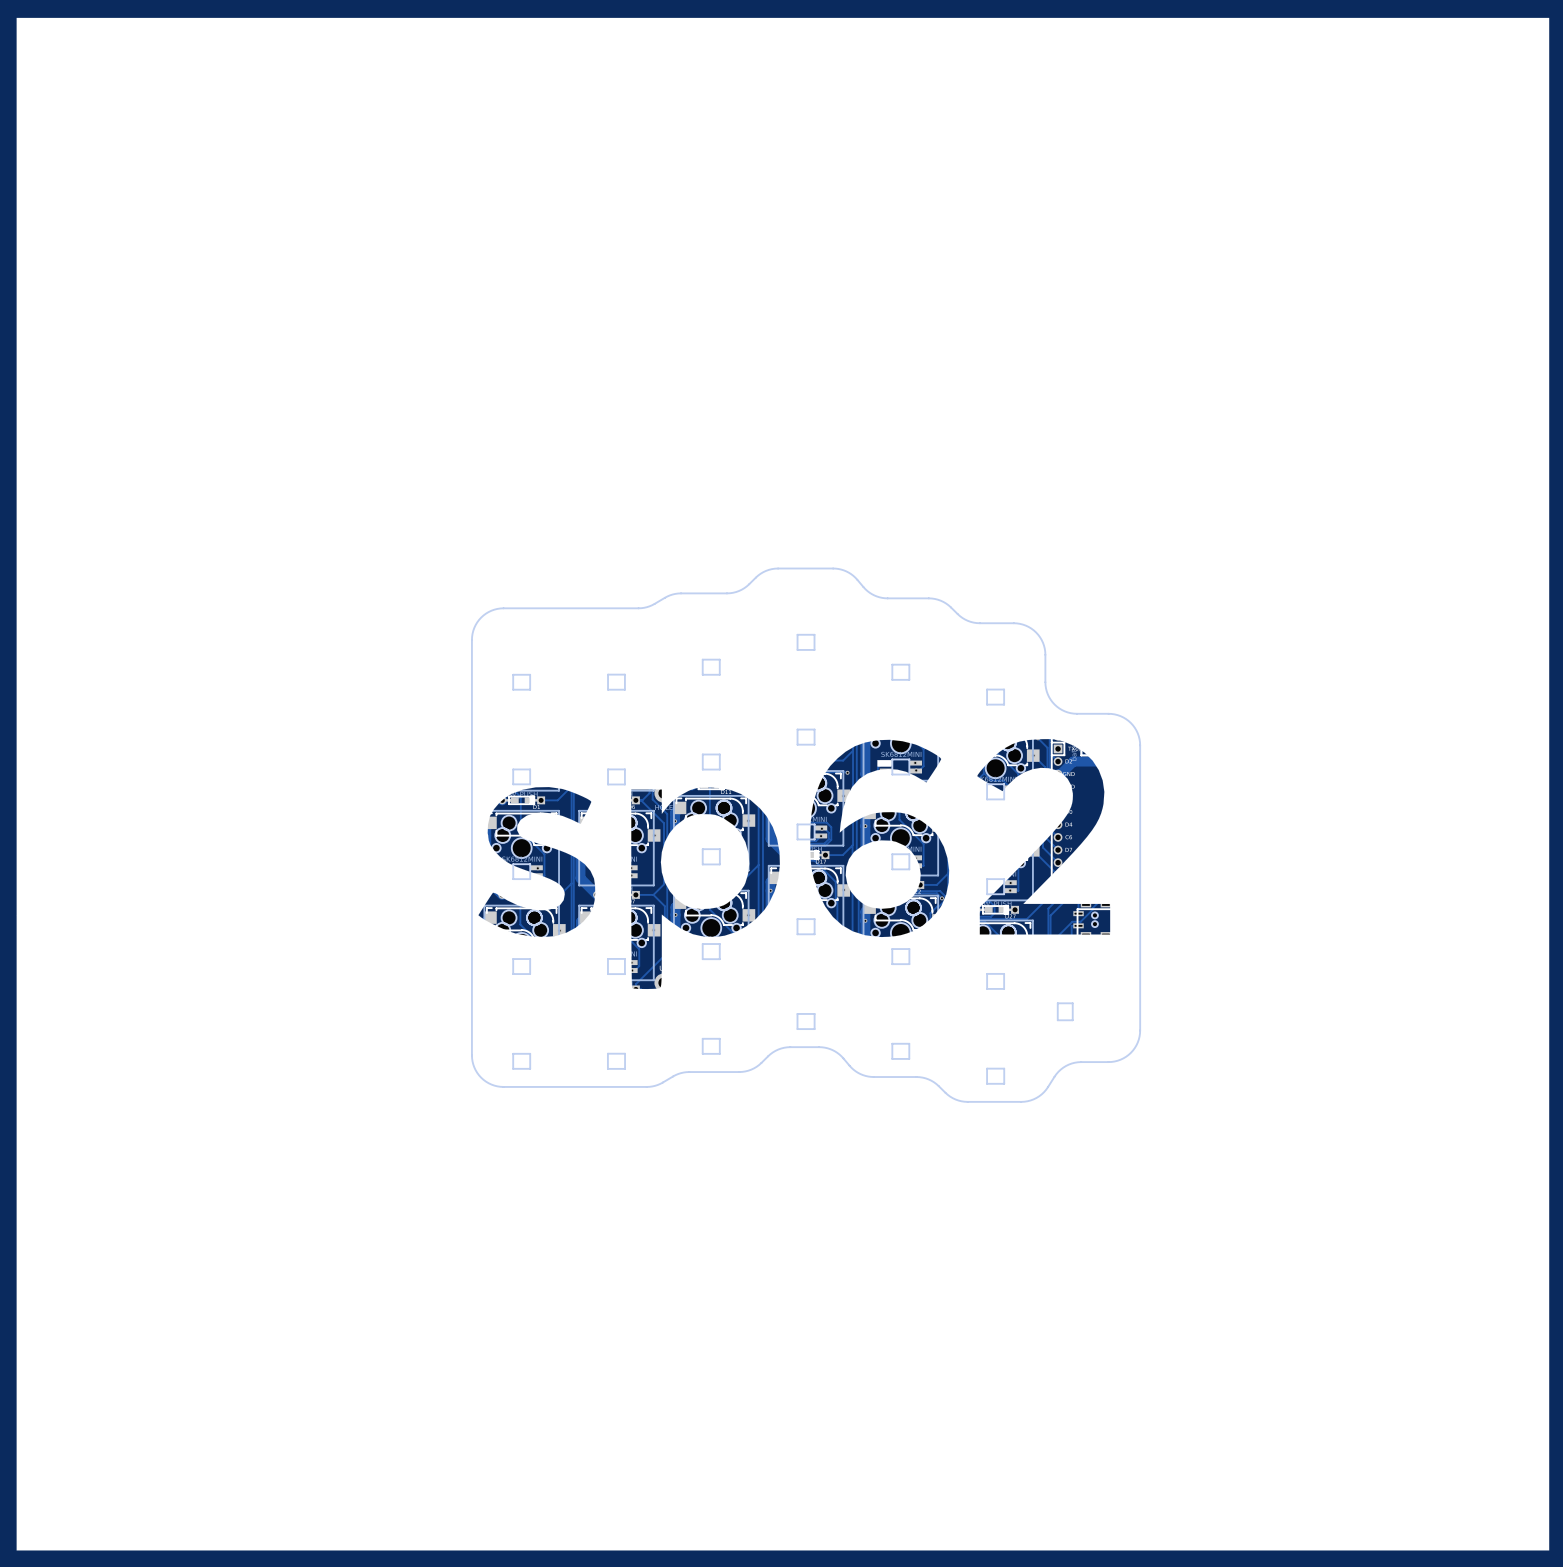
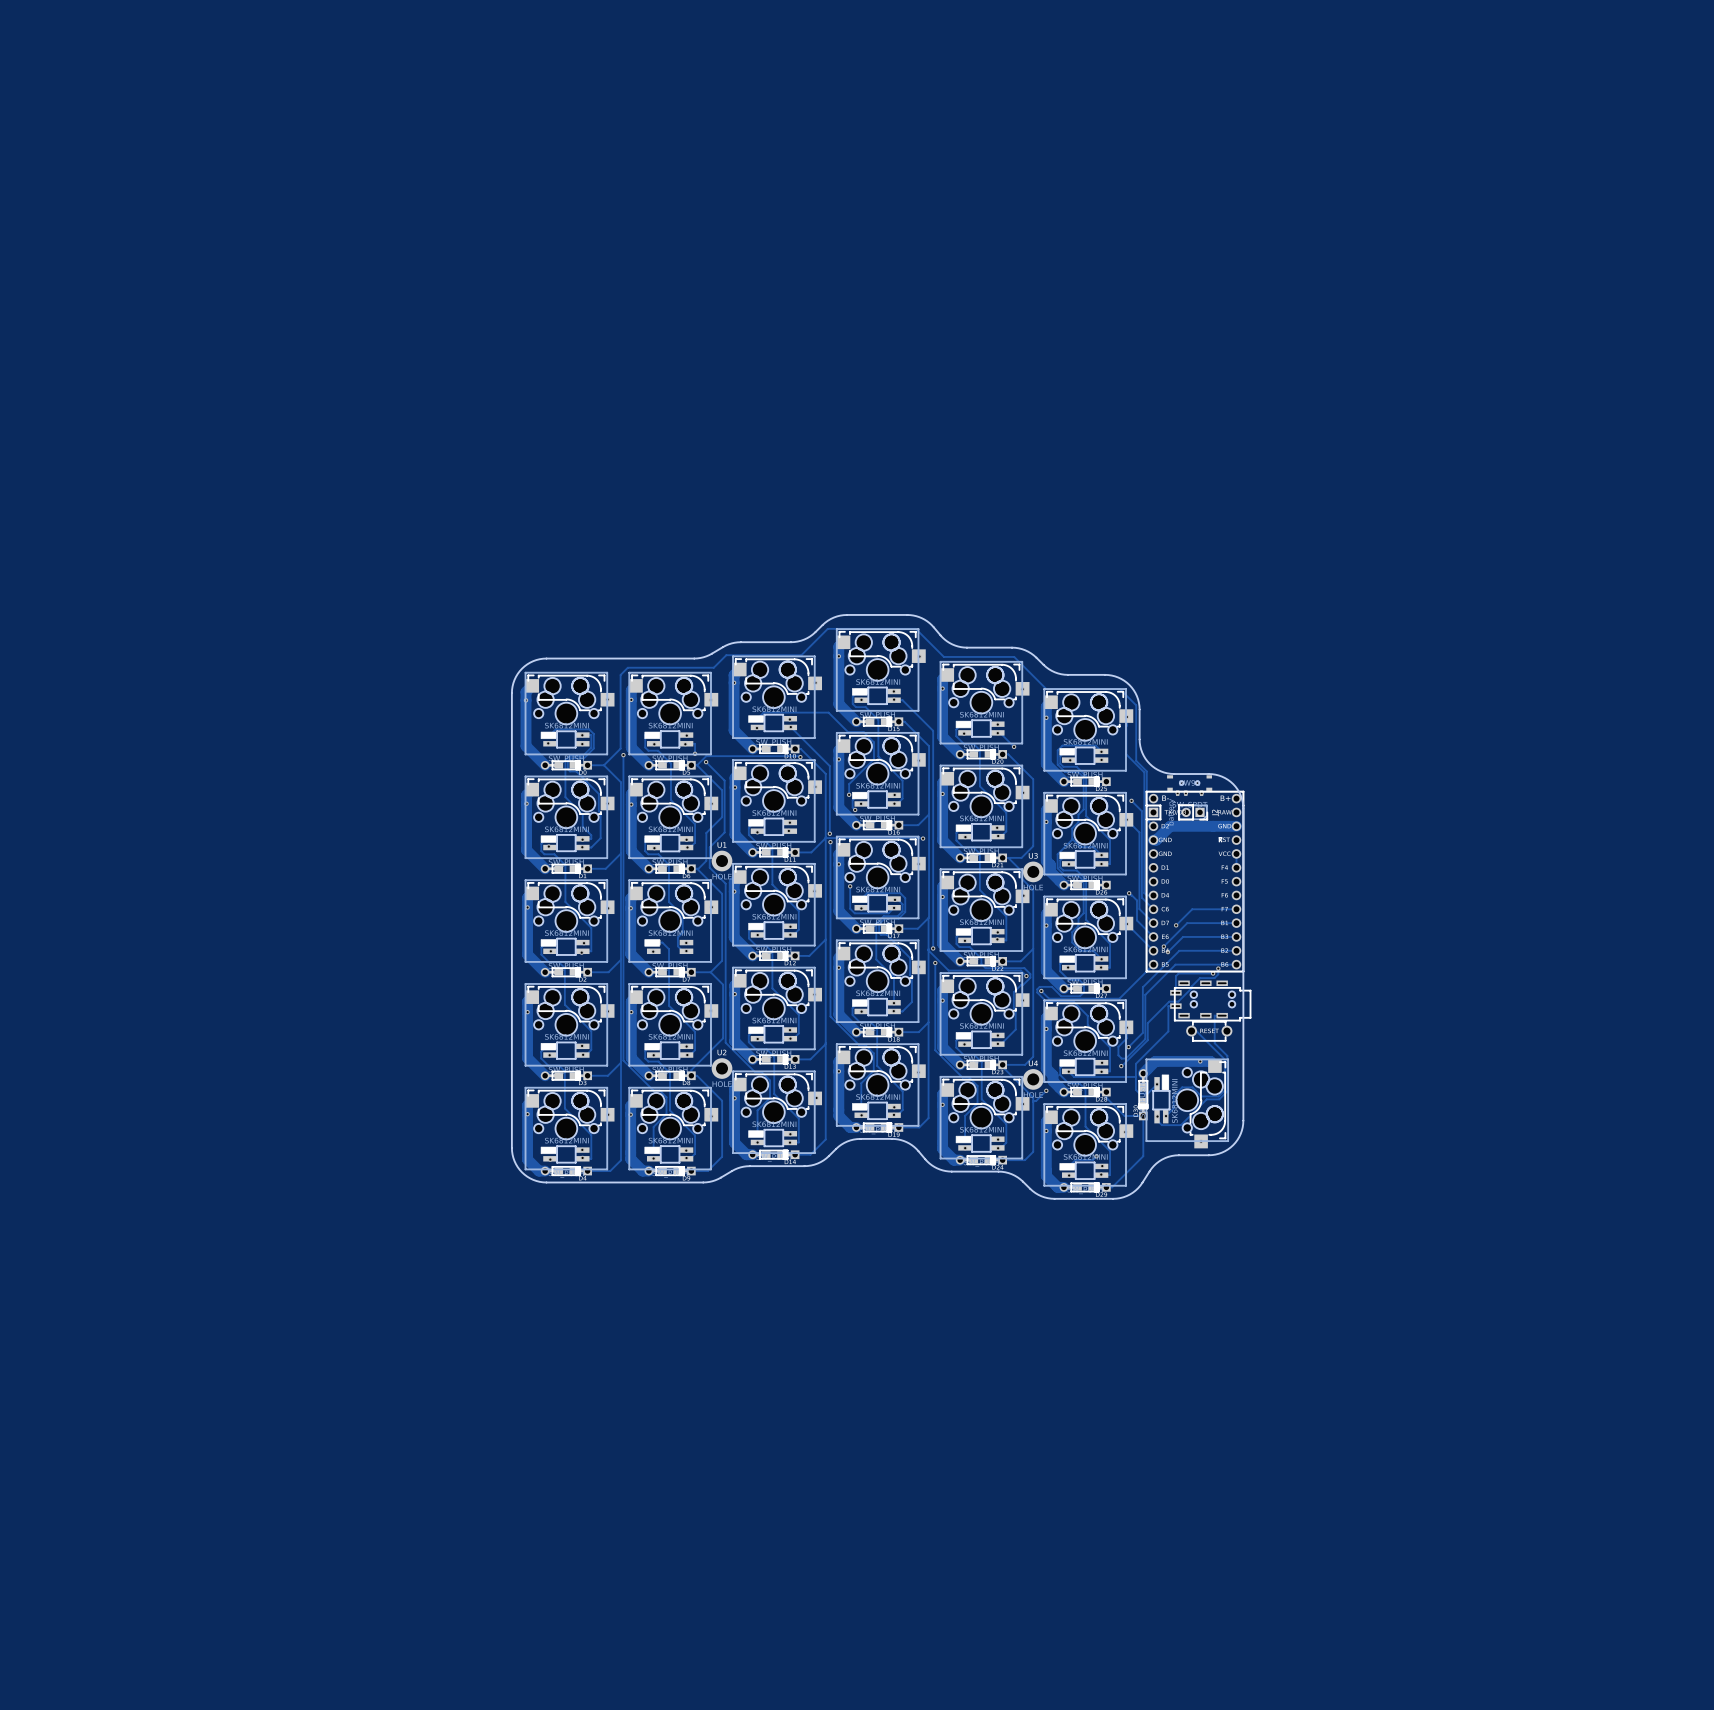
drawing: [16, 17, 1550, 1551] -> none

